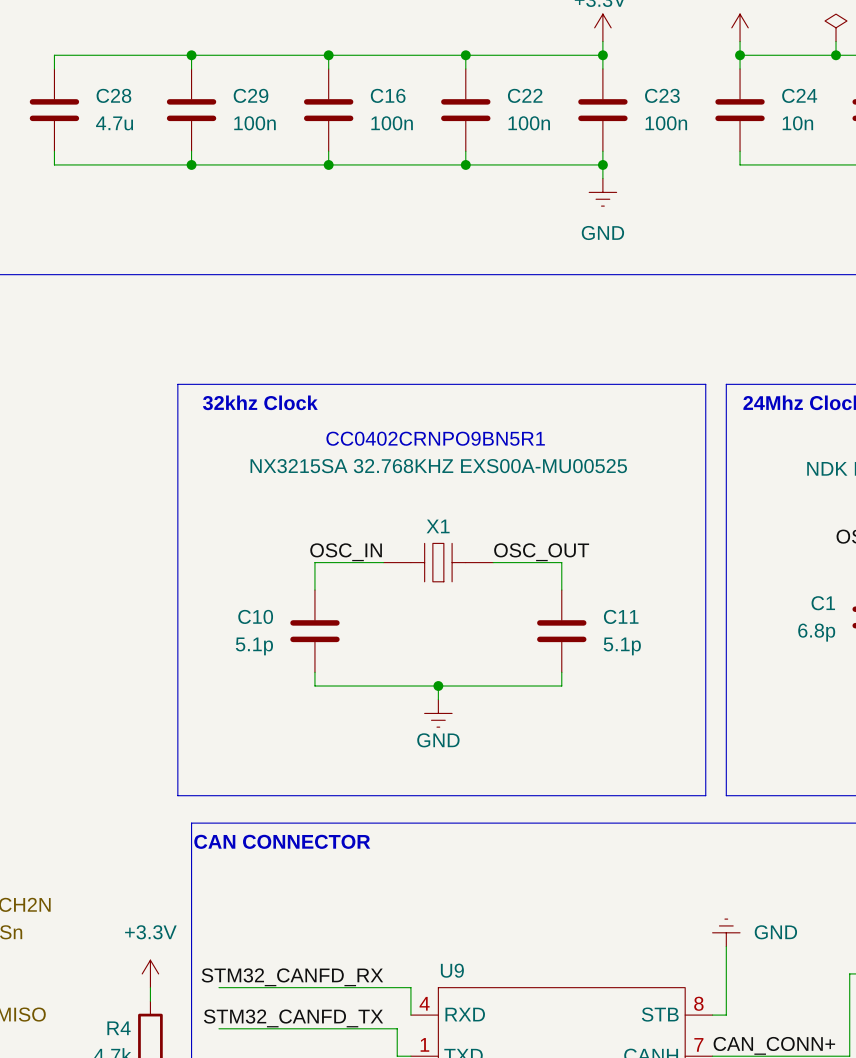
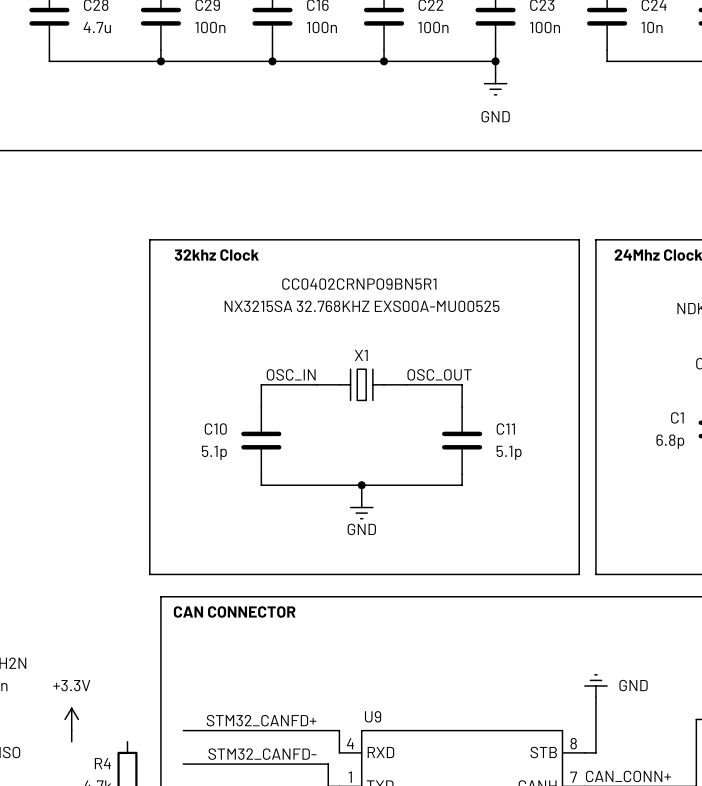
power symbol position: +3.3V (150, 973) -> +3.3V (71, 719)
label: STM32_CANFD_RX (292, 977) -> STM32_CANFD+ (261, 720)
wire: (150, 987) (150, 1001) -> (71, 730) (71, 741)
label: STM32_CANFD_TX (293, 1018) -> STM32_CANFD- (262, 754)

